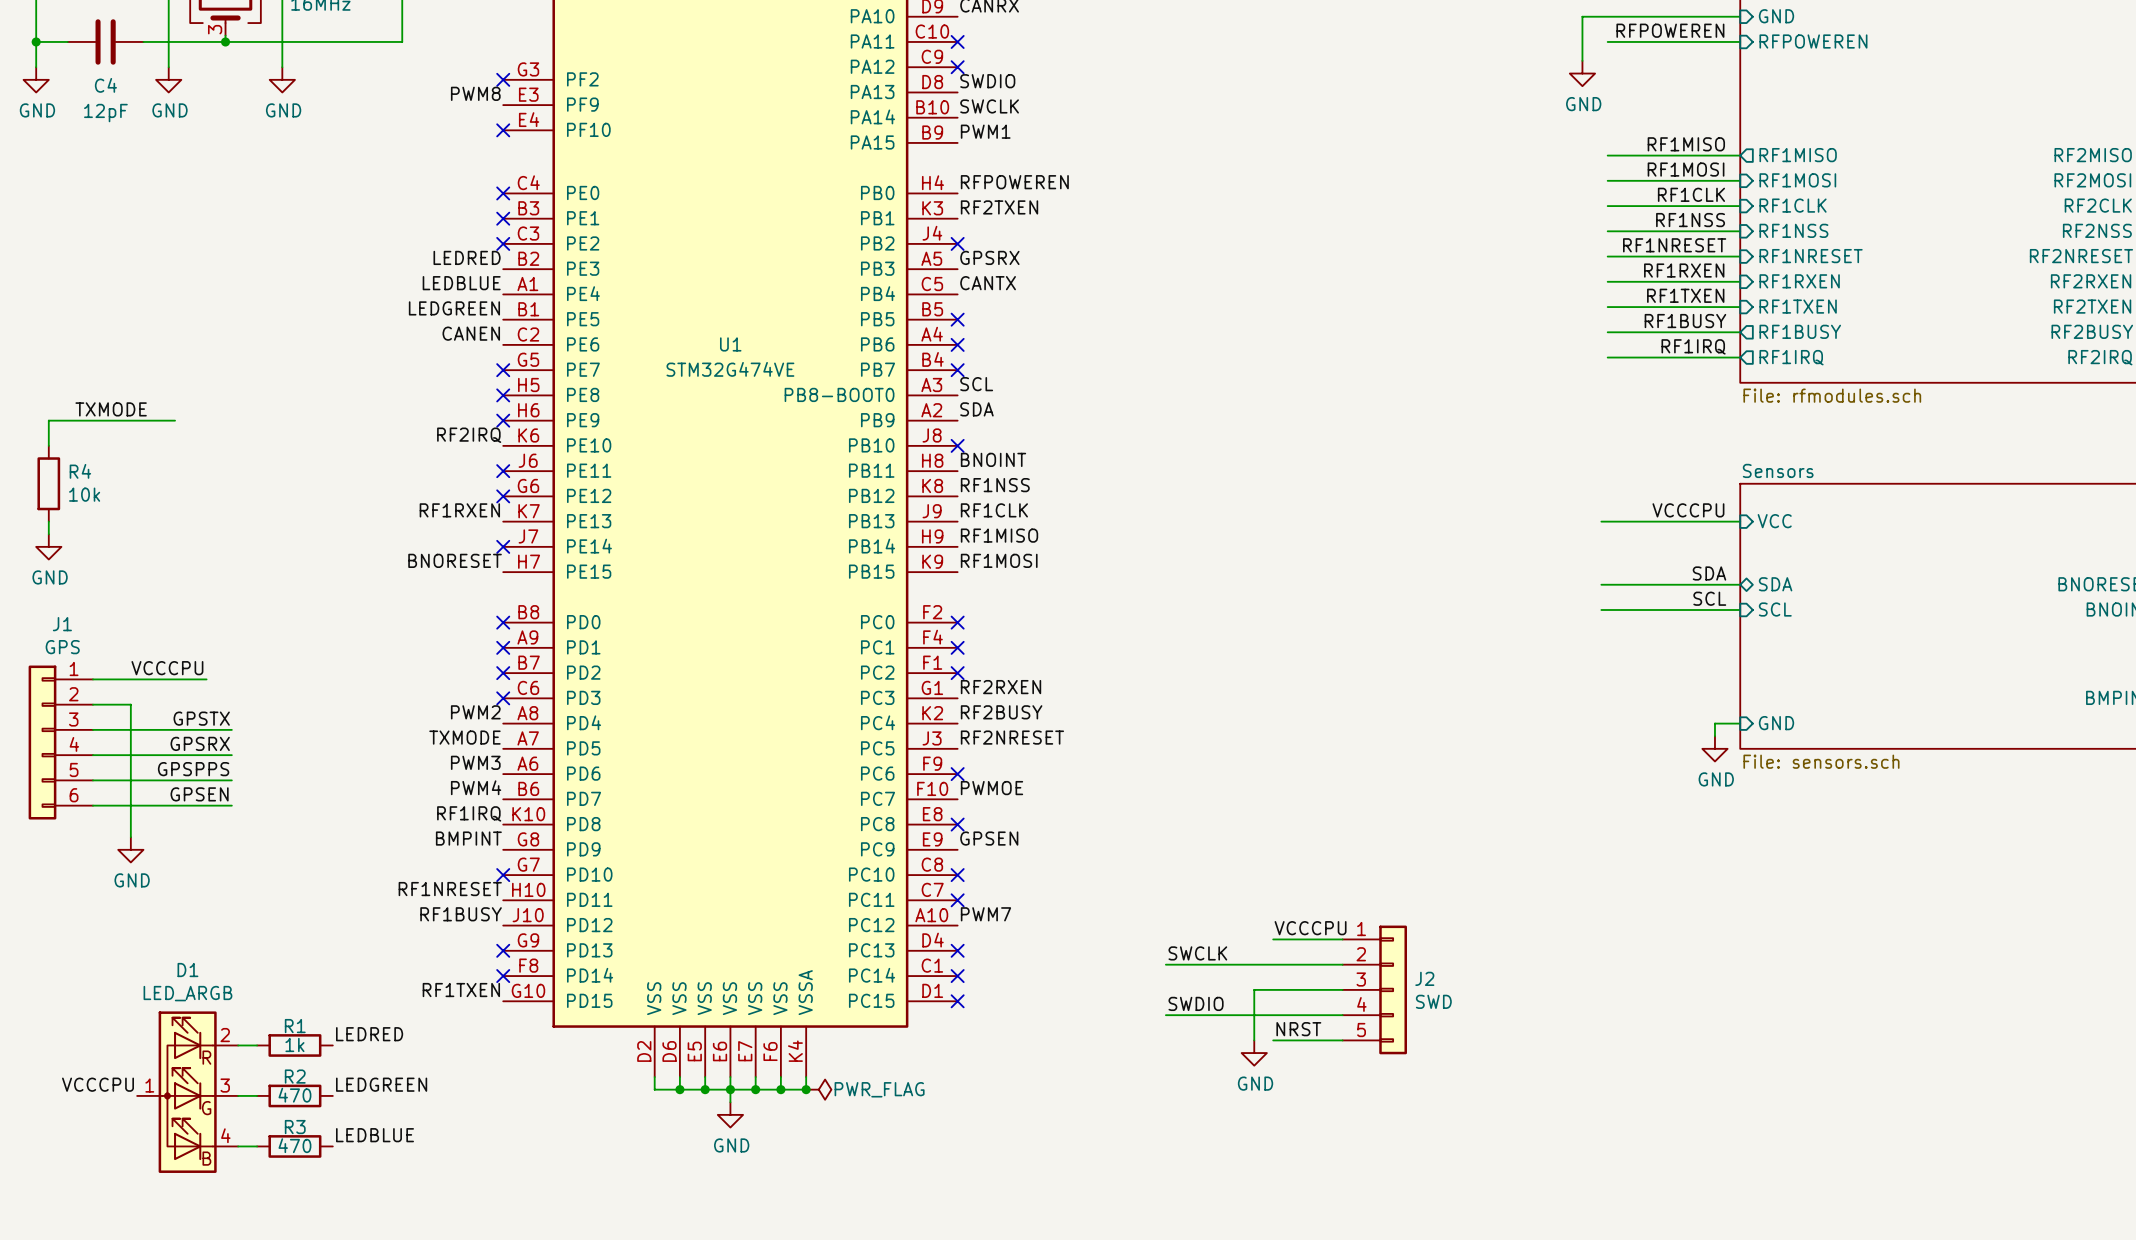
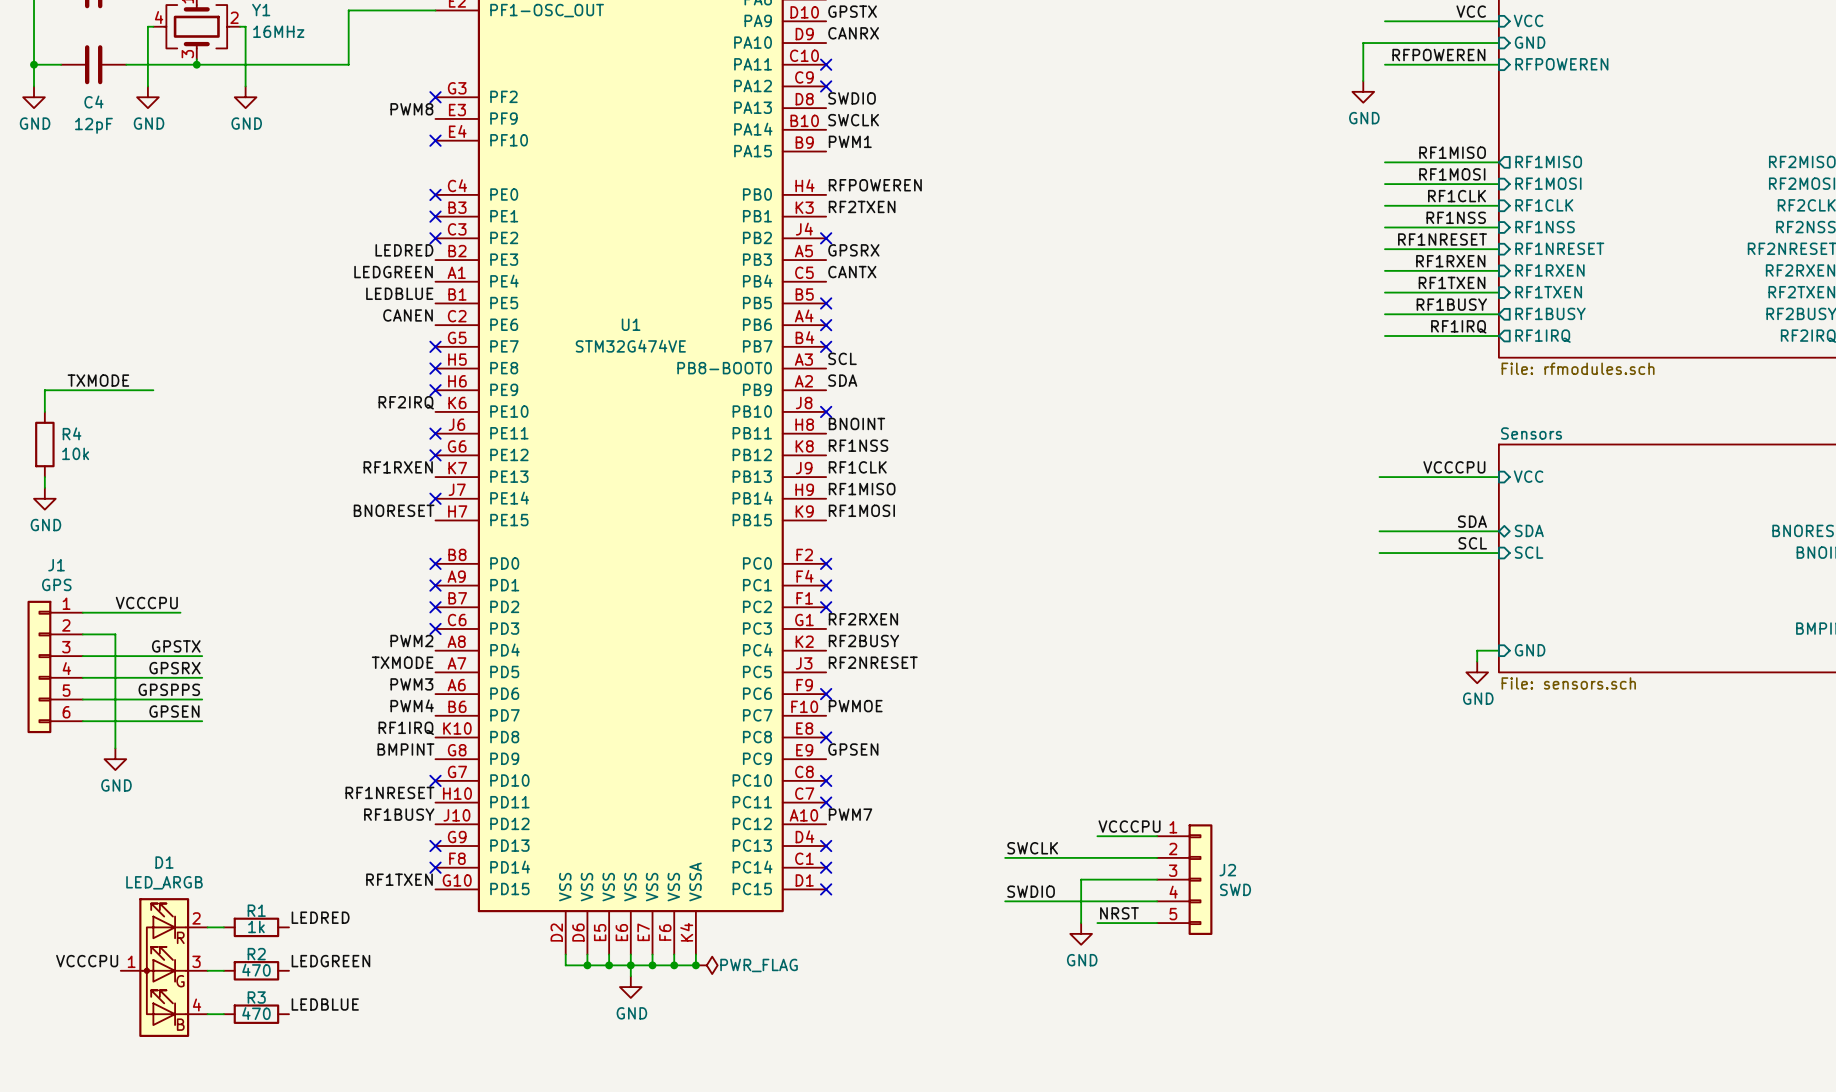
label: LEDBLUE (461, 283) -> LEDGREEN (393, 272)
label: LEDGREEN (454, 308) -> LEDBLUE (399, 293)

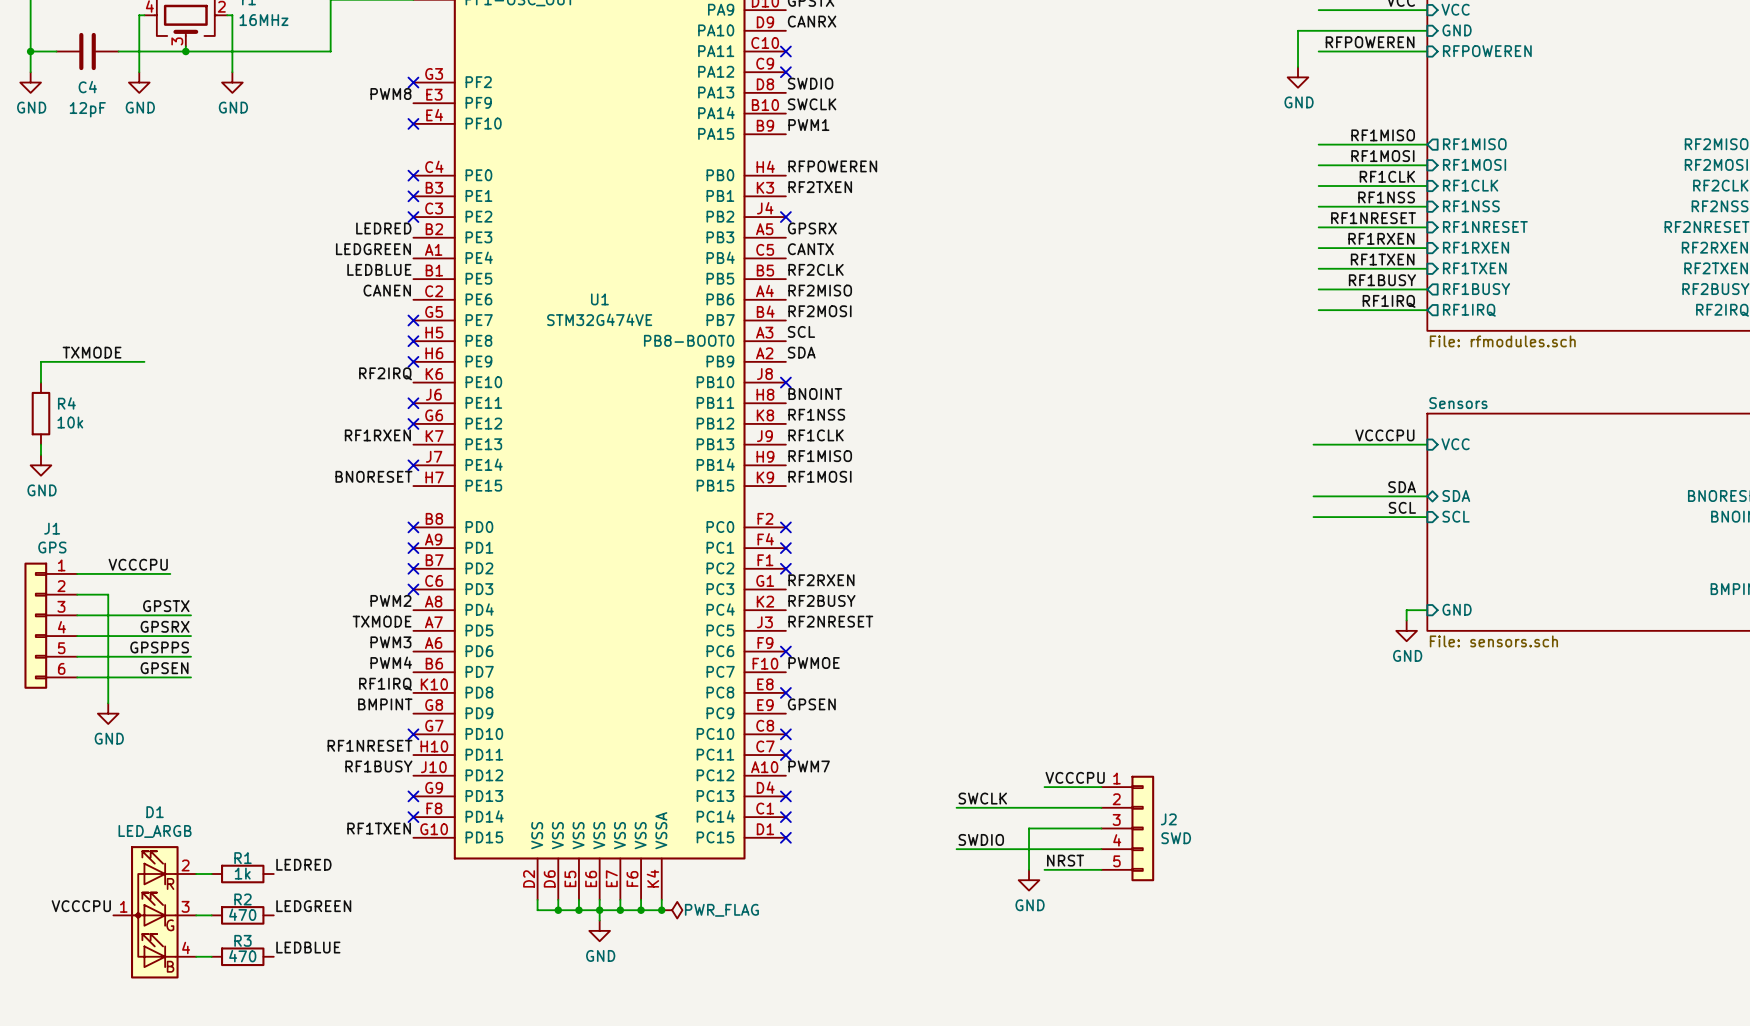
label: none -> RF2CLK (816, 269)
no-connect mark: (826, 303) -> none
label: none -> RF2MISO (820, 290)
no-connect mark: (826, 325) -> none
label: none -> RF2MOSI (819, 311)
no-connect mark: (826, 346) -> none

